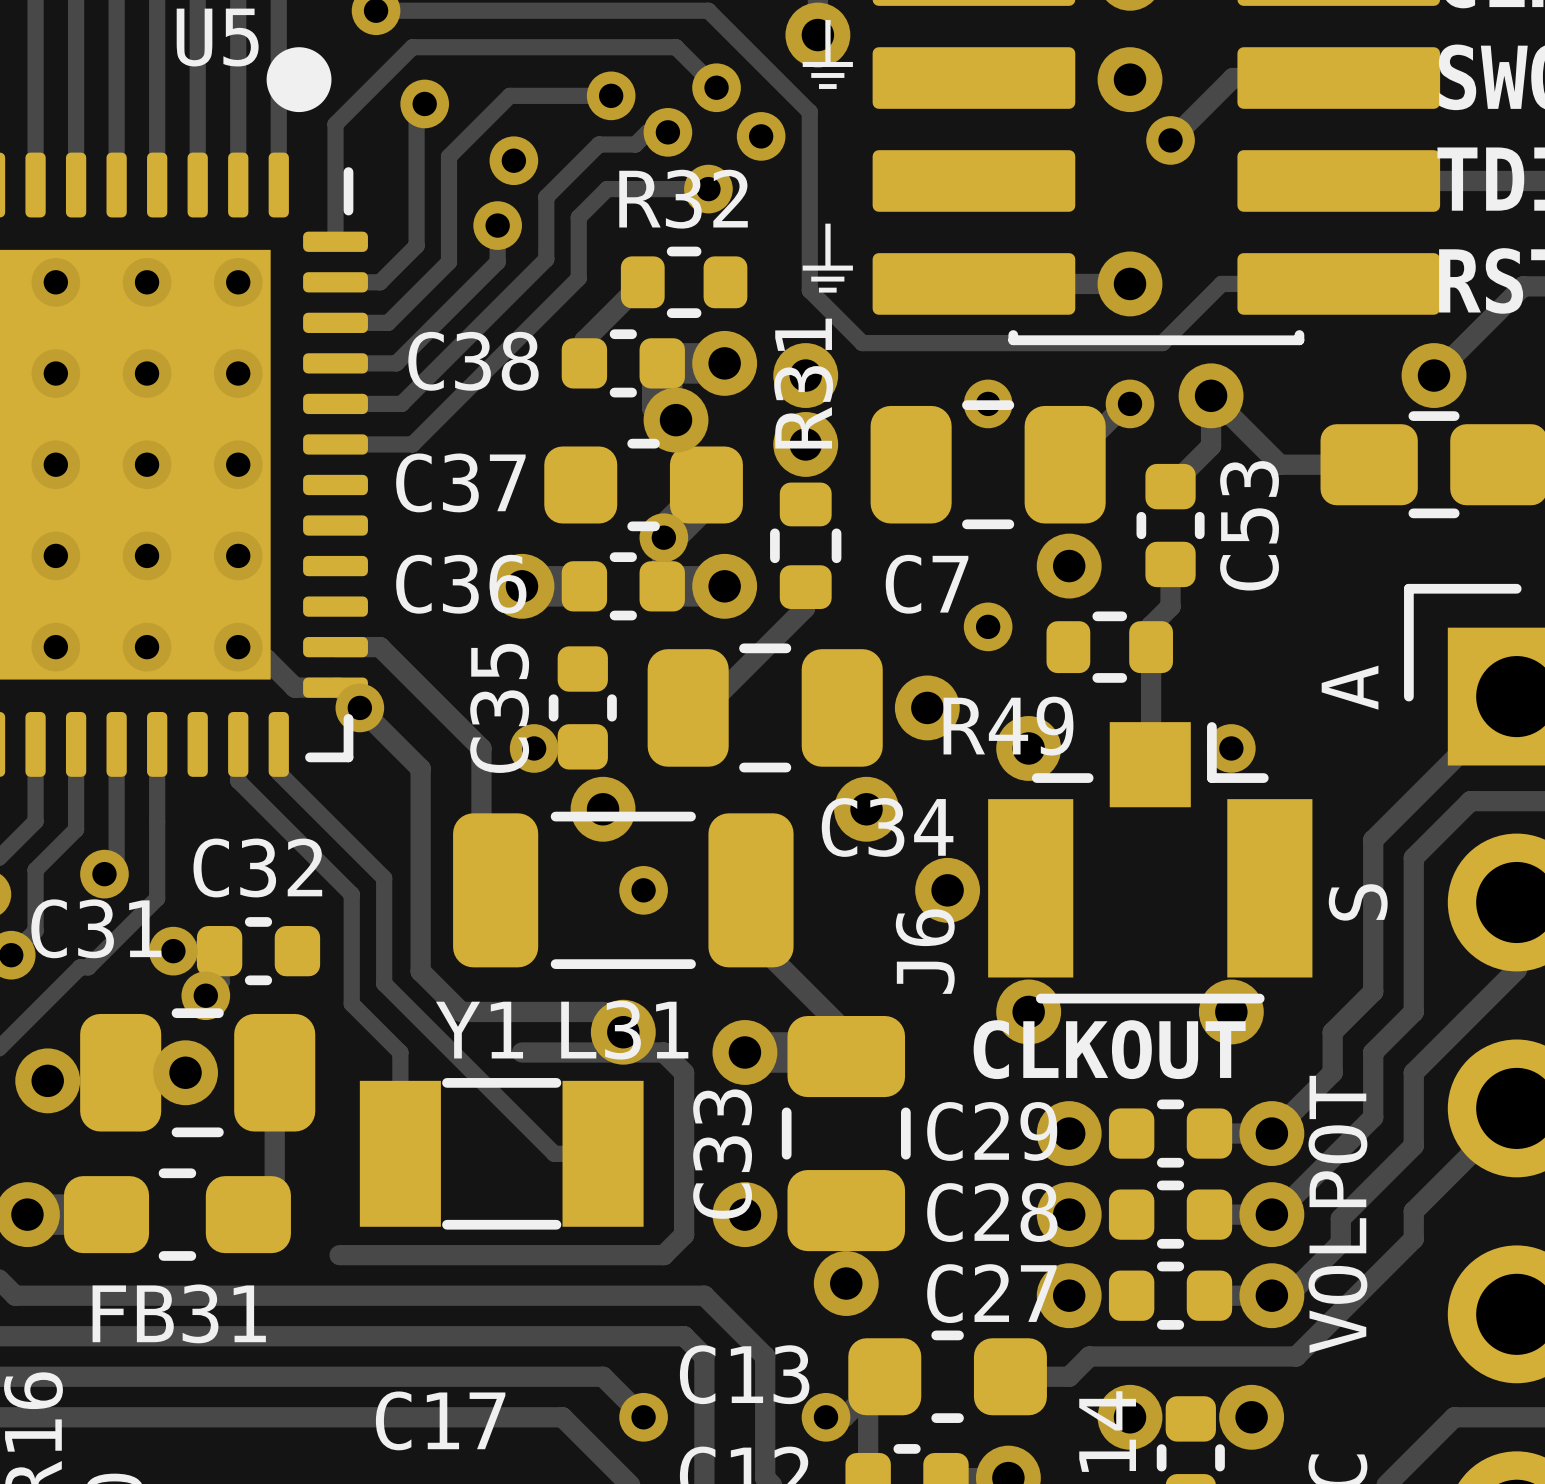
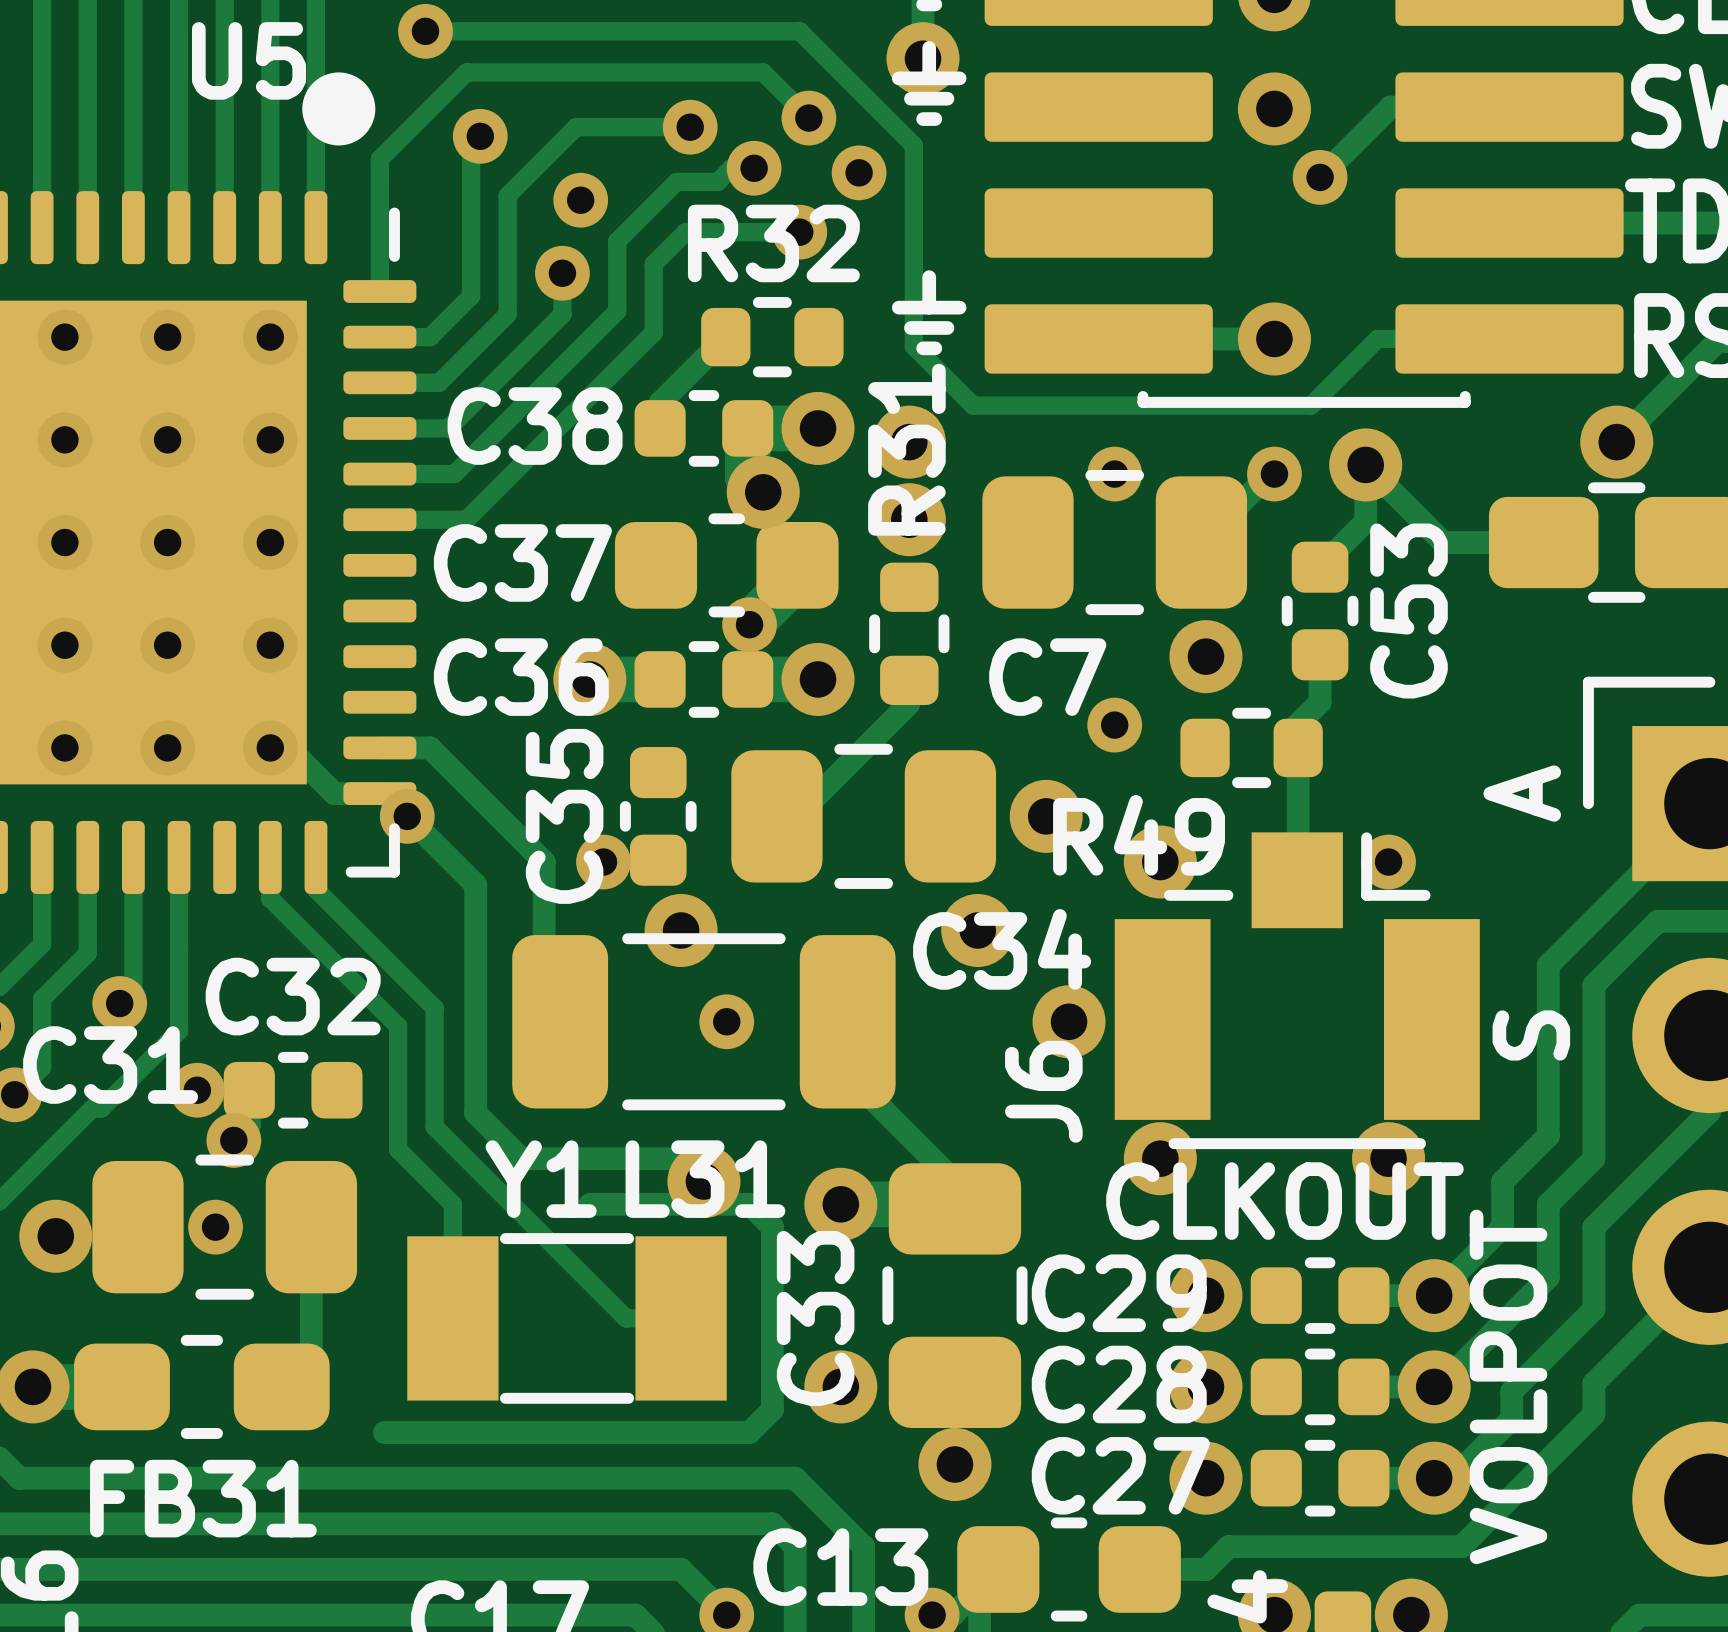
via size: [153, 1040, 218, 1106] -> [188, 1199, 243, 1255]

